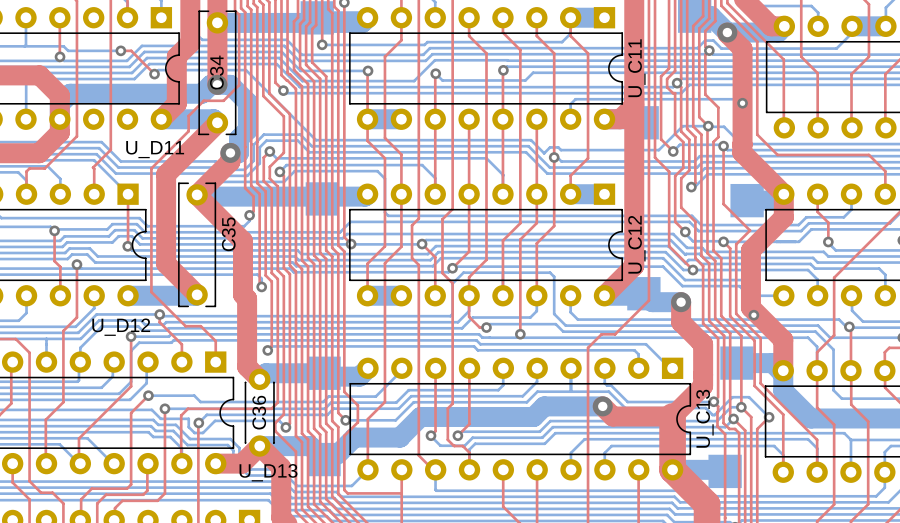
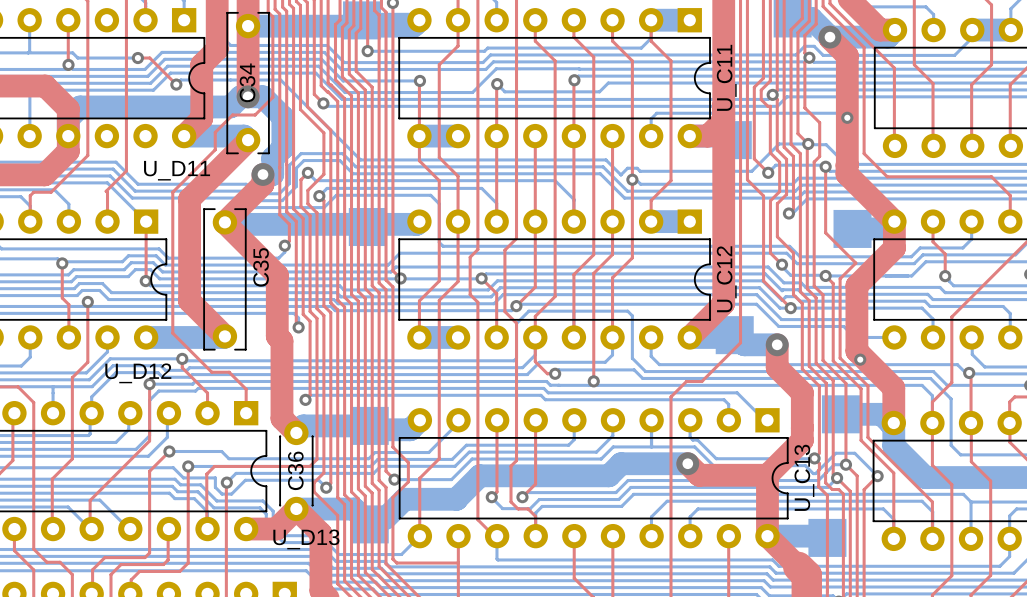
top track width: thick (672, 416) (672, 469) (699, 496) -> thin (767, 475) (767, 536) (798, 566)

